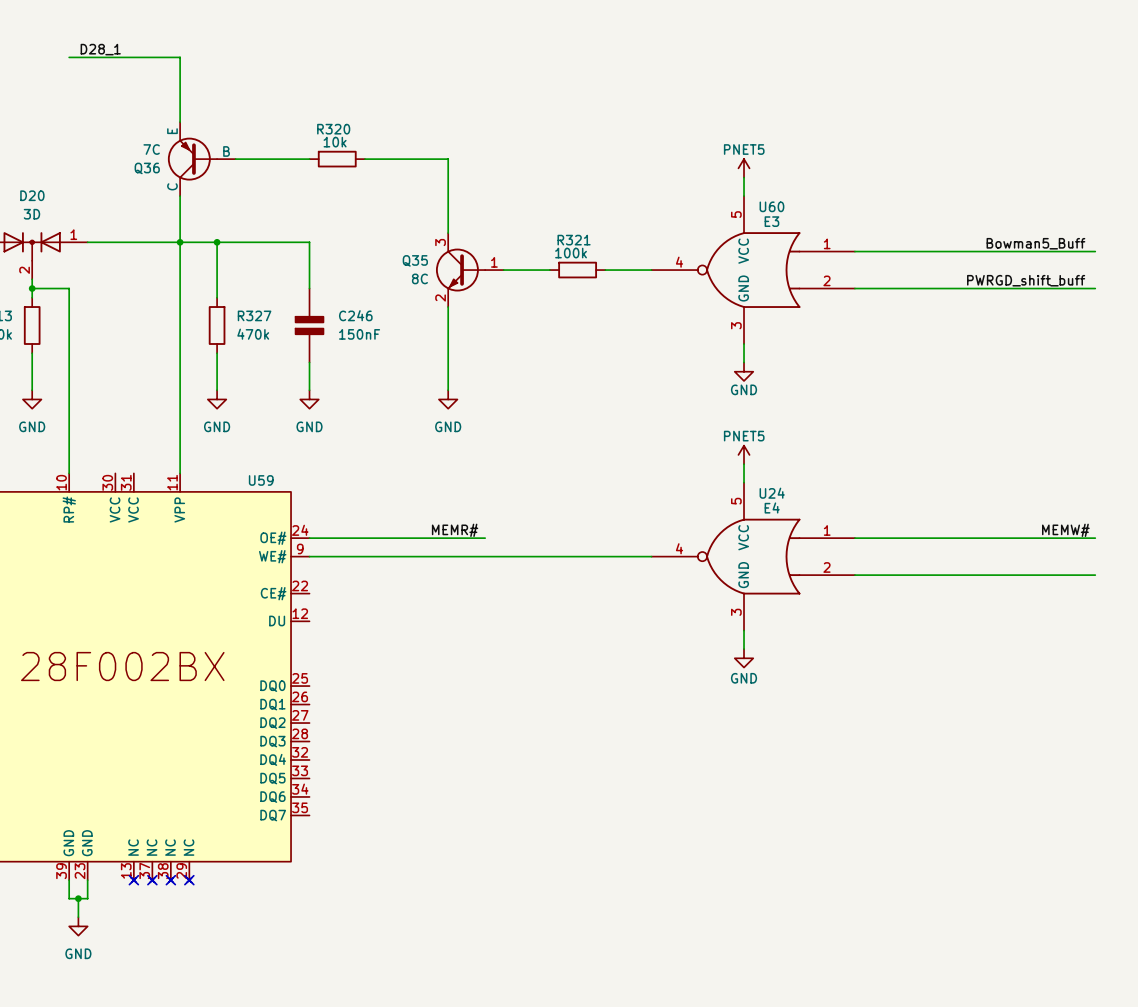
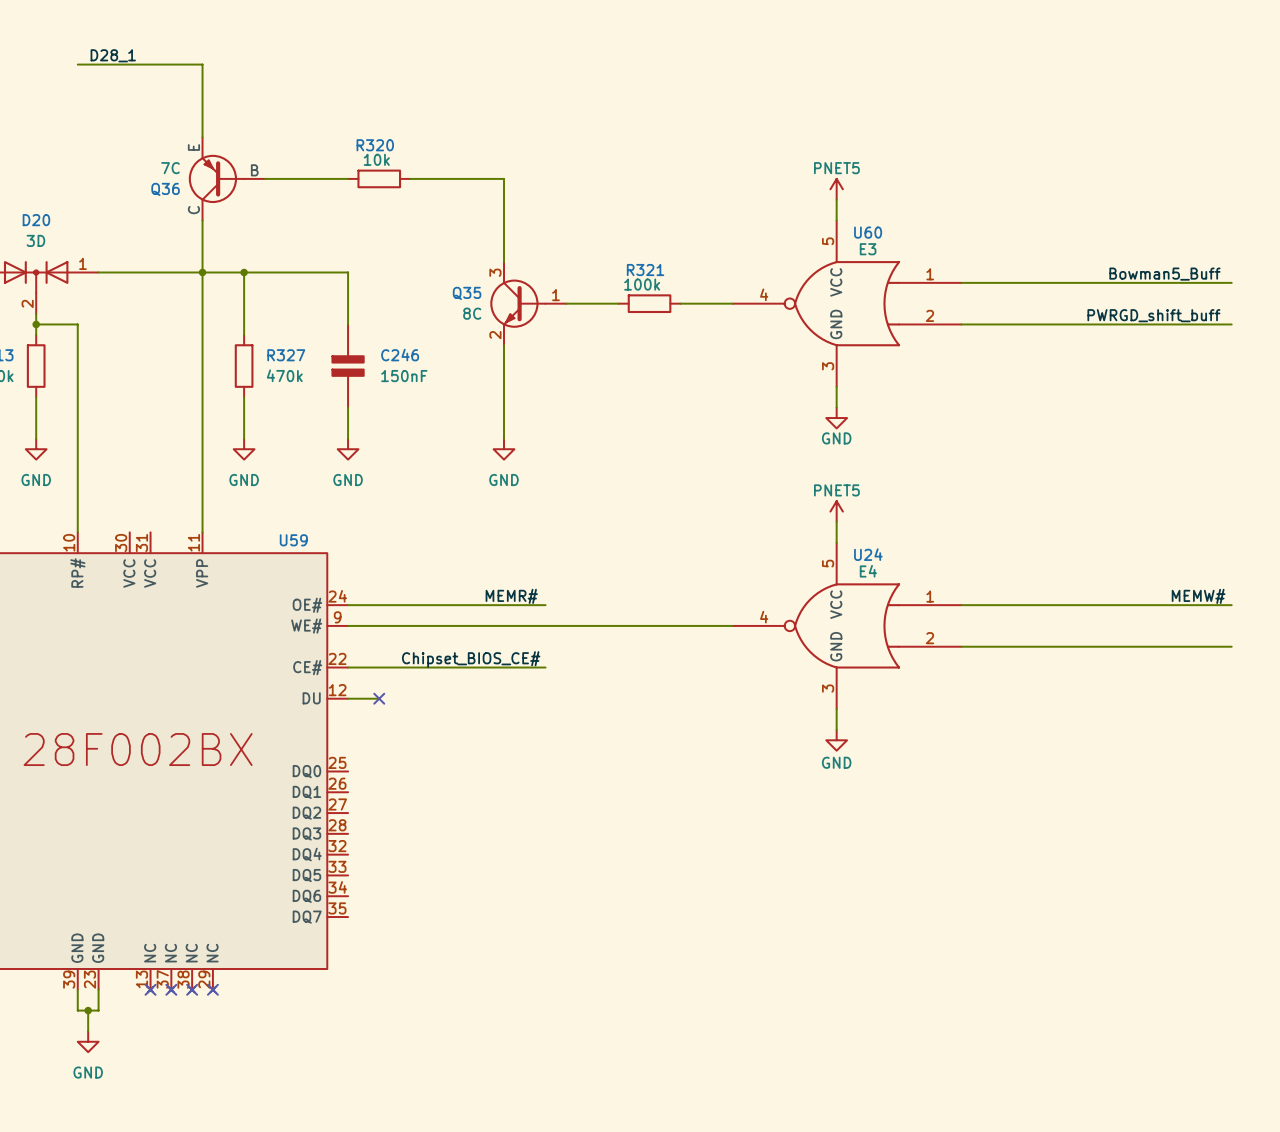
label: none -> Chipset_BIOS_CE# (471, 659)
wire: none -> (348, 667) (545, 667)
wire: none -> (348, 698) (379, 698)
no-connect mark: none -> (379, 698)

